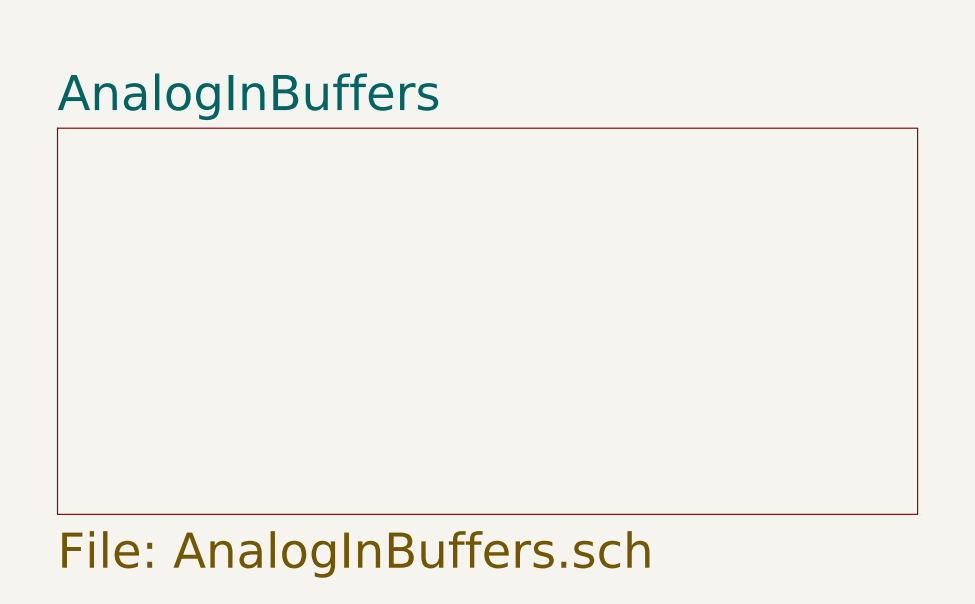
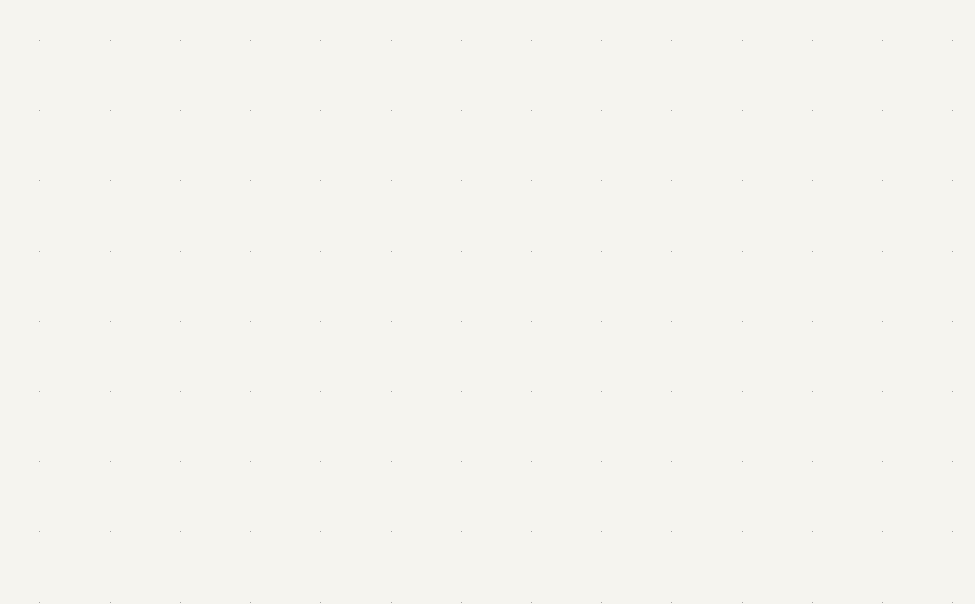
sheet AnalogInBuffers: File: AnalogInBuffers.sch (487, 321) -> none

